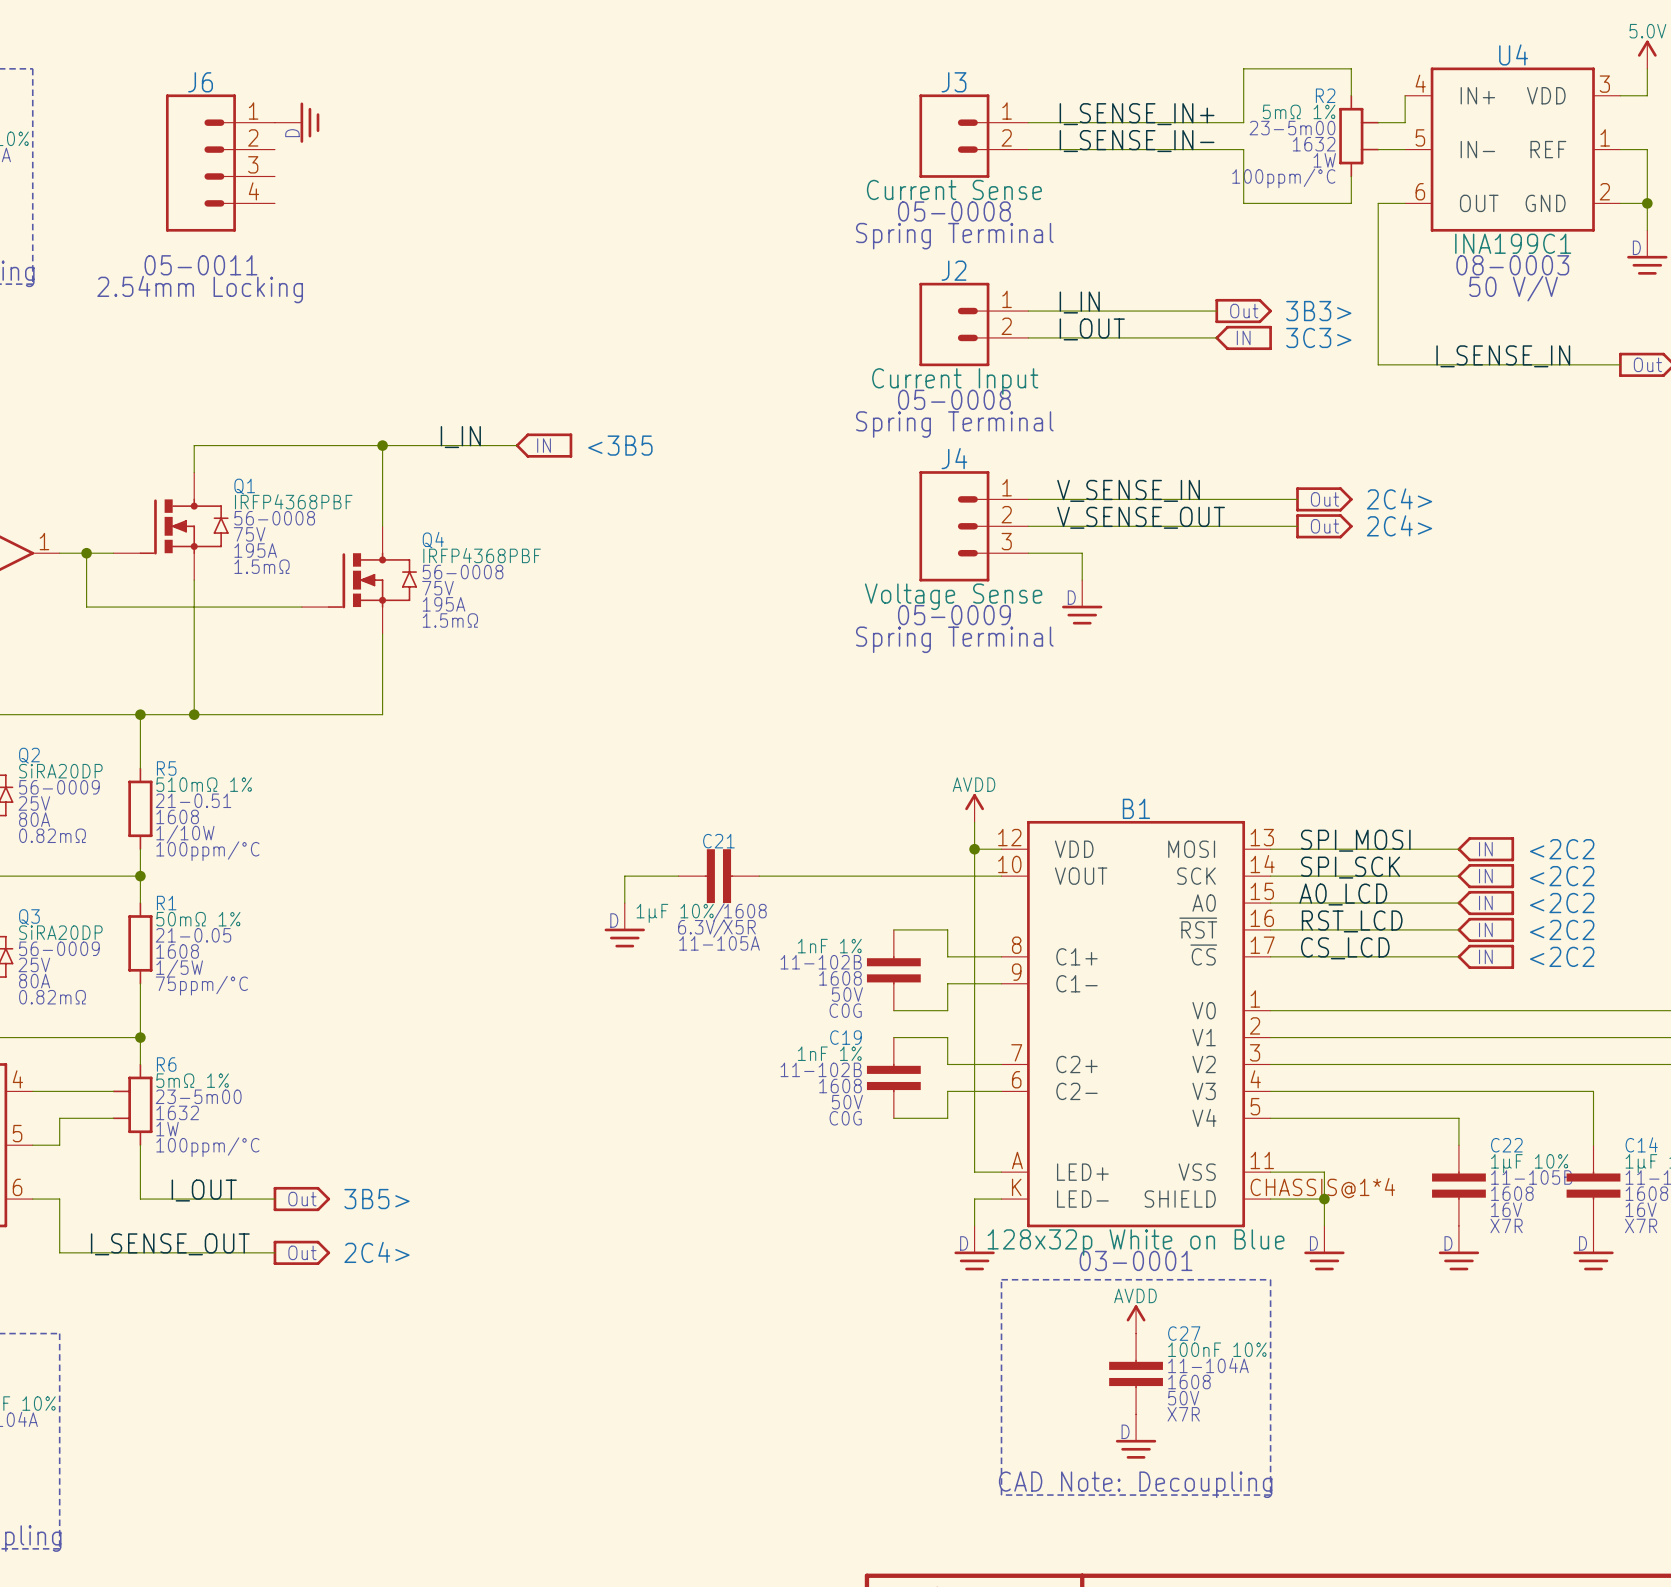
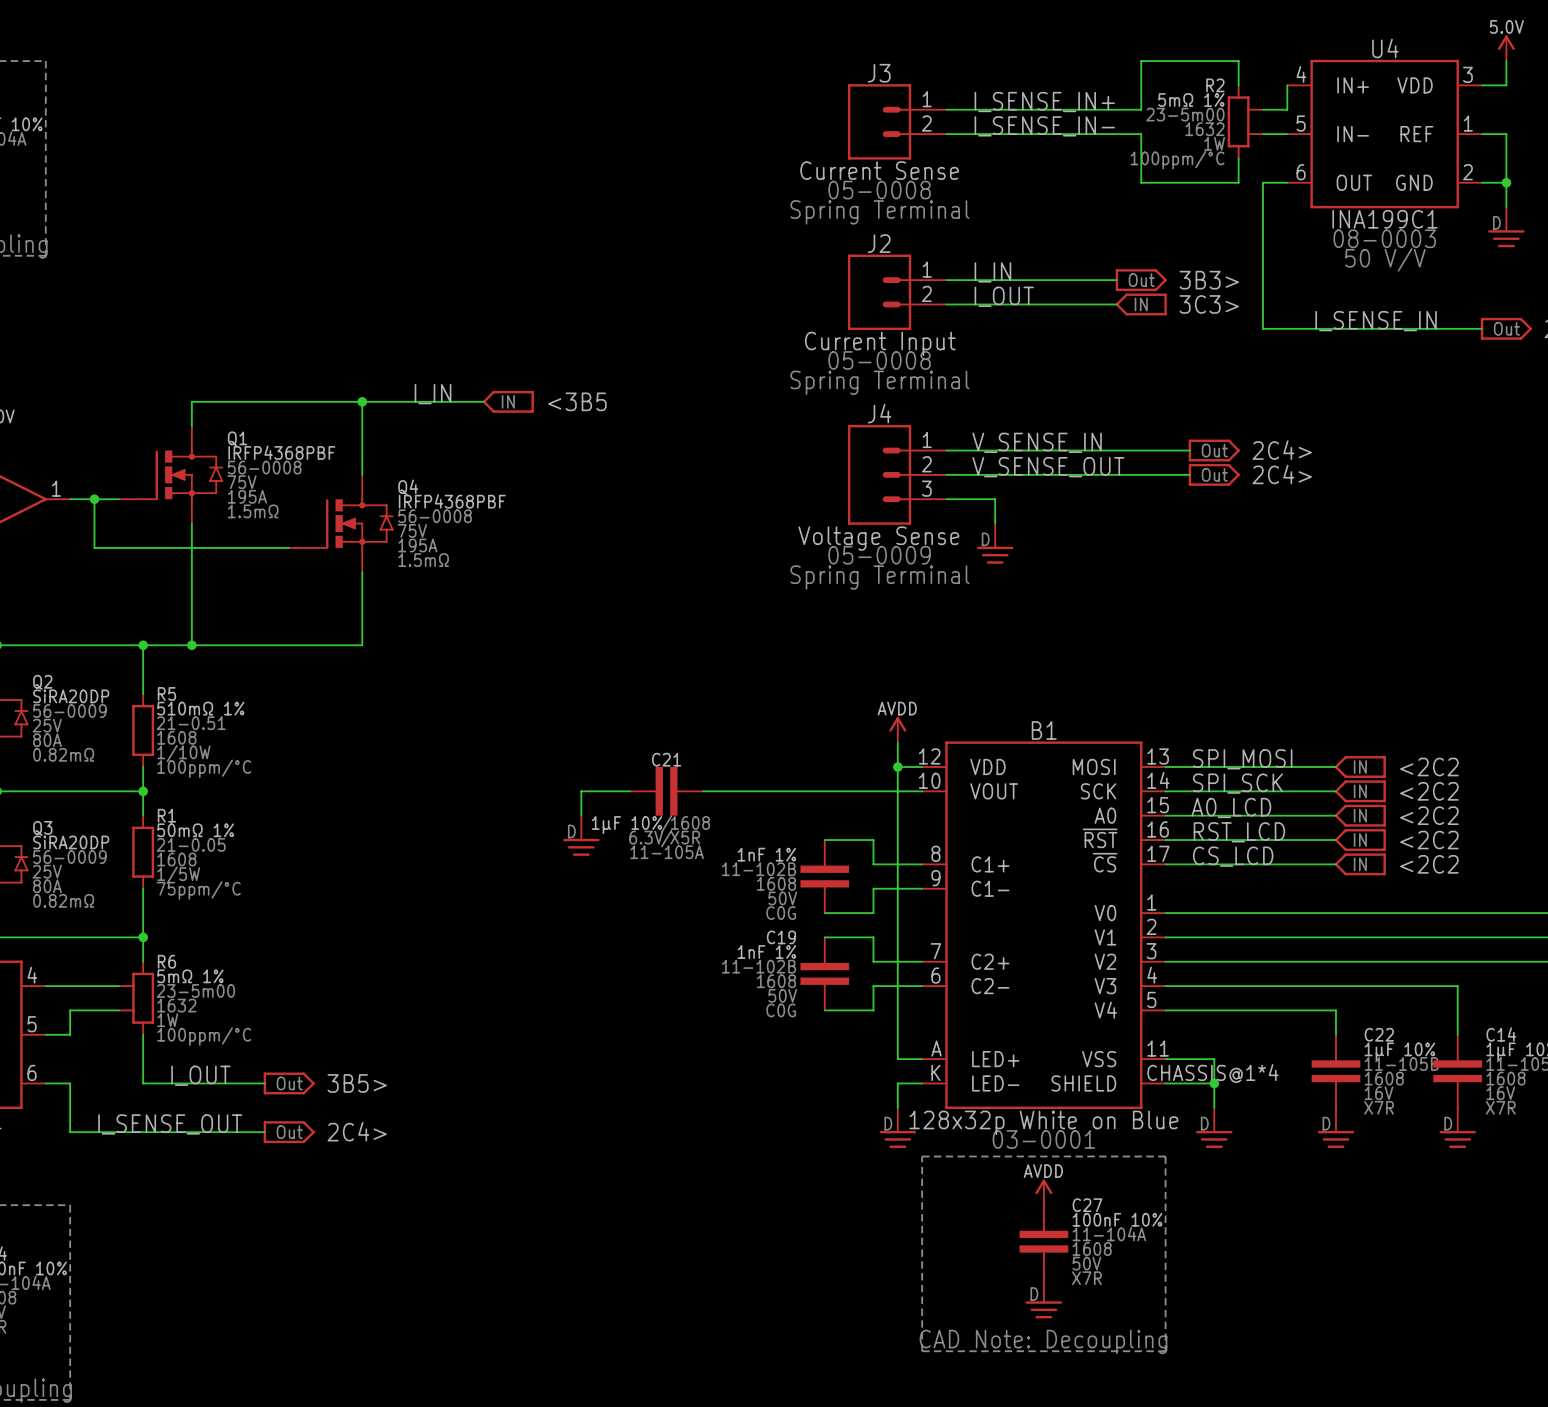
power symbol: (297, 122) -> none
J6: (220, 163) -> none

